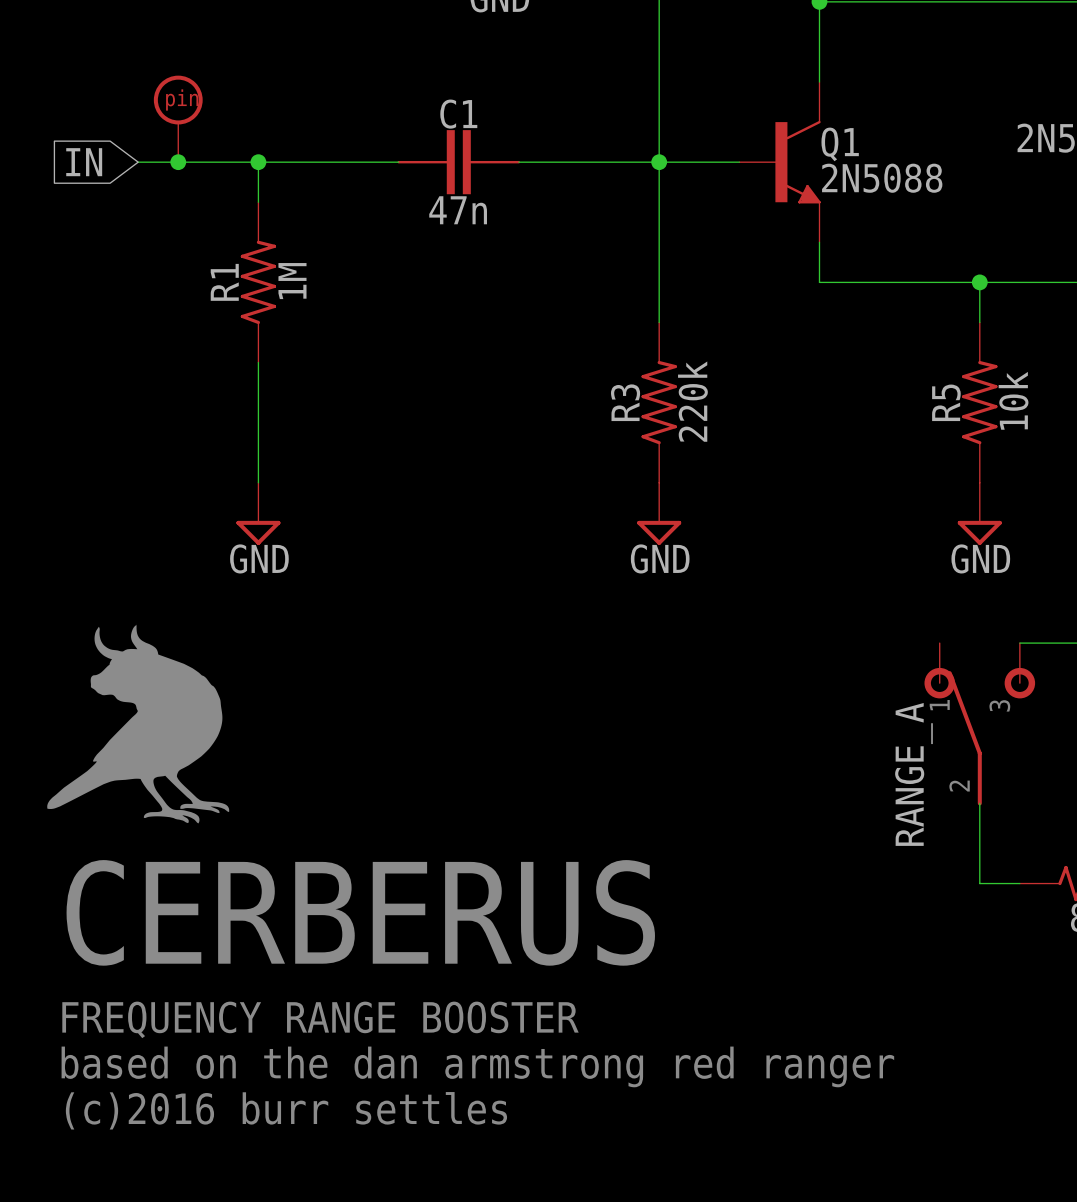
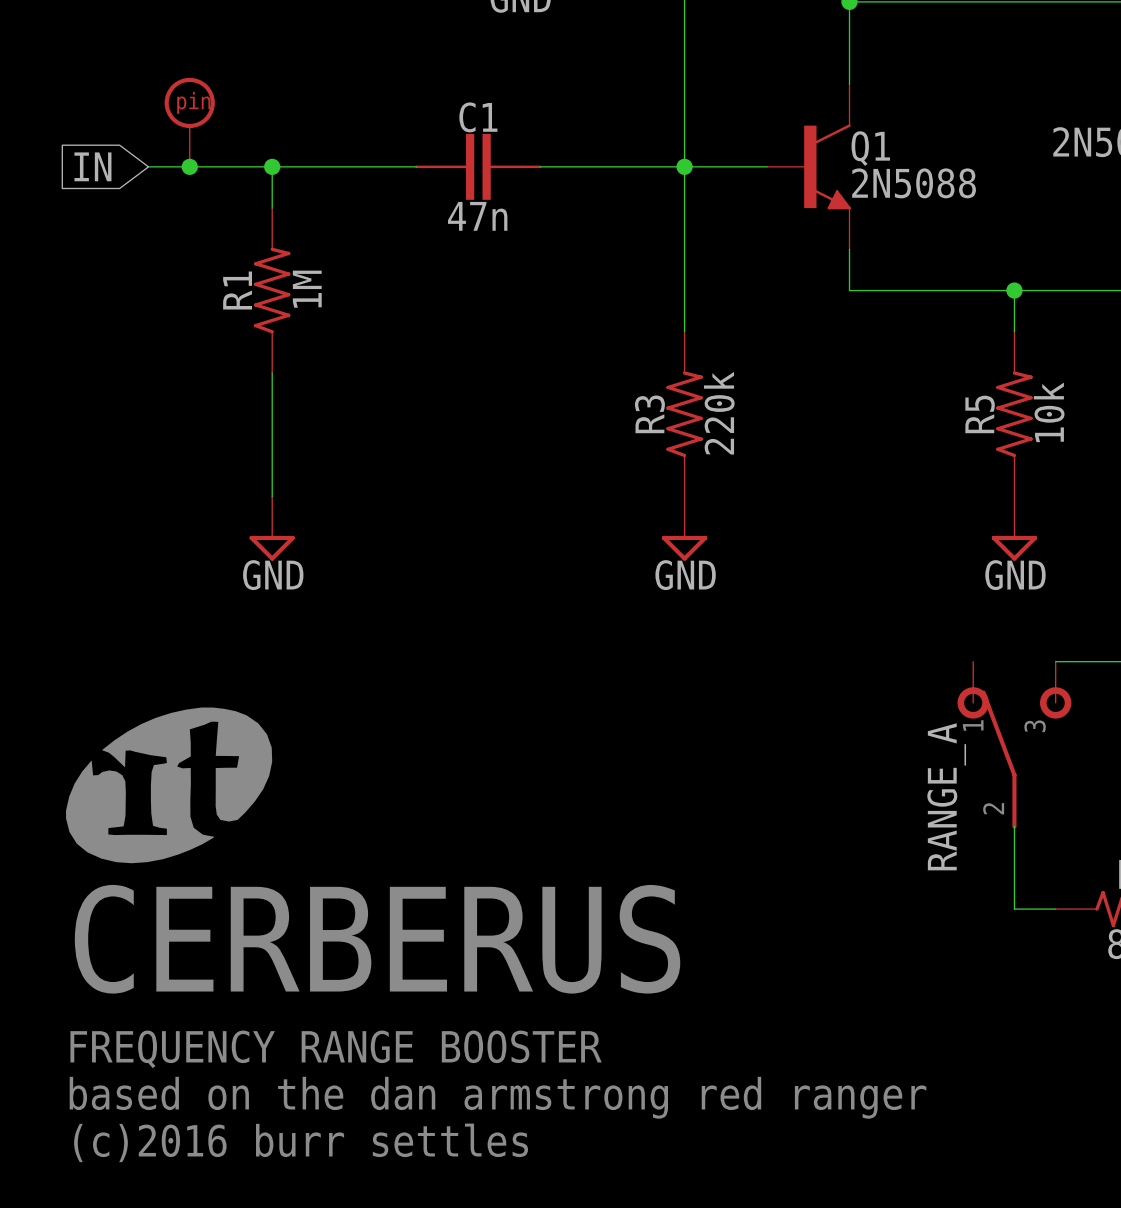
part: (138, 723) -> none
part: none -> (169, 785)

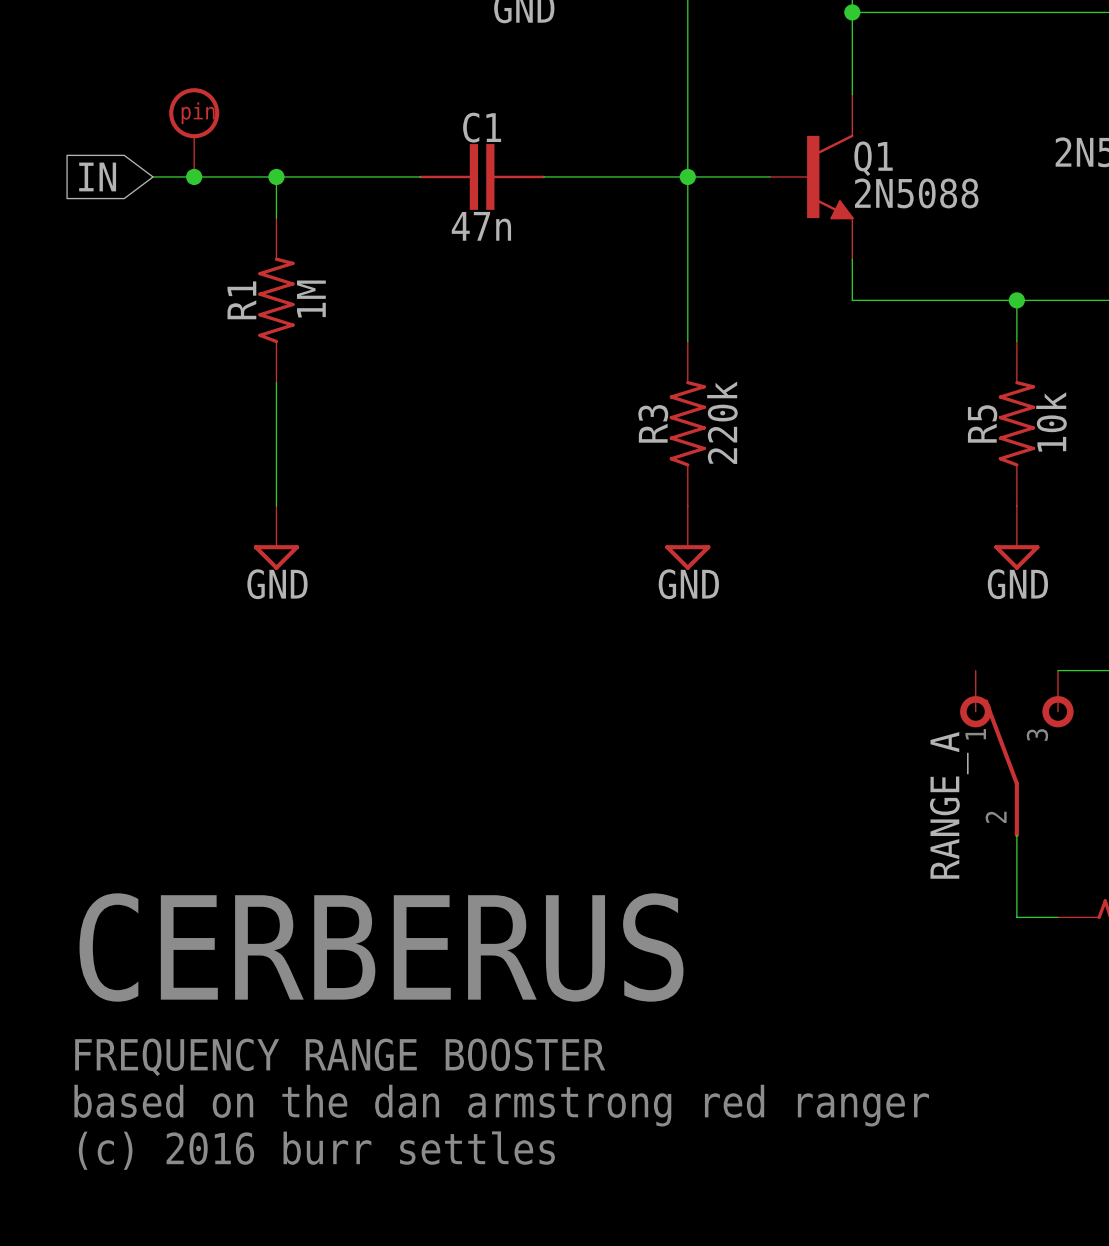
part: (169, 785) -> none
text: (c)2016 burr settles (301, 1142) -> (c) 2016 burr settles (316, 1150)

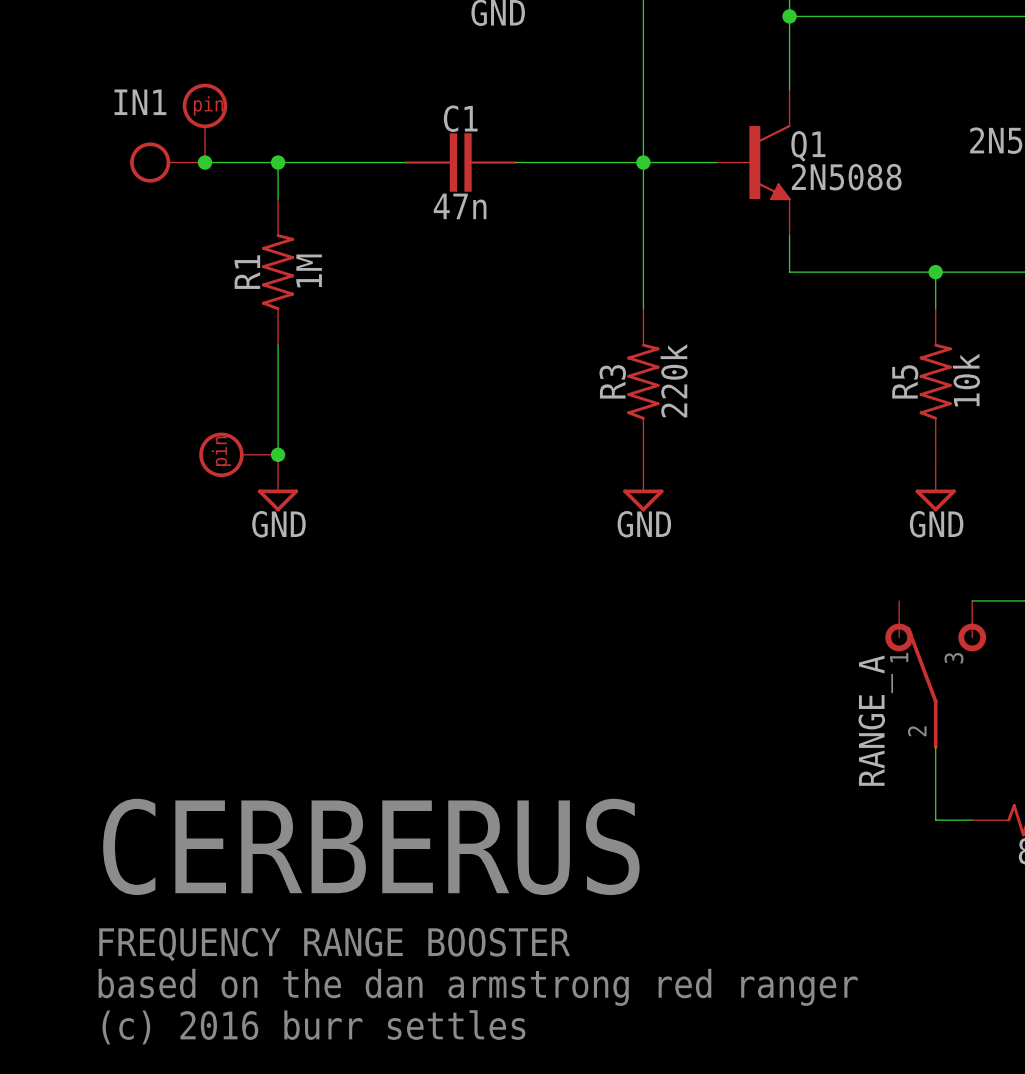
global label: IN (97, 176) -> none
IN1: none -> (167, 162)
part: none -> (238, 454)
junction: none -> (278, 454)

